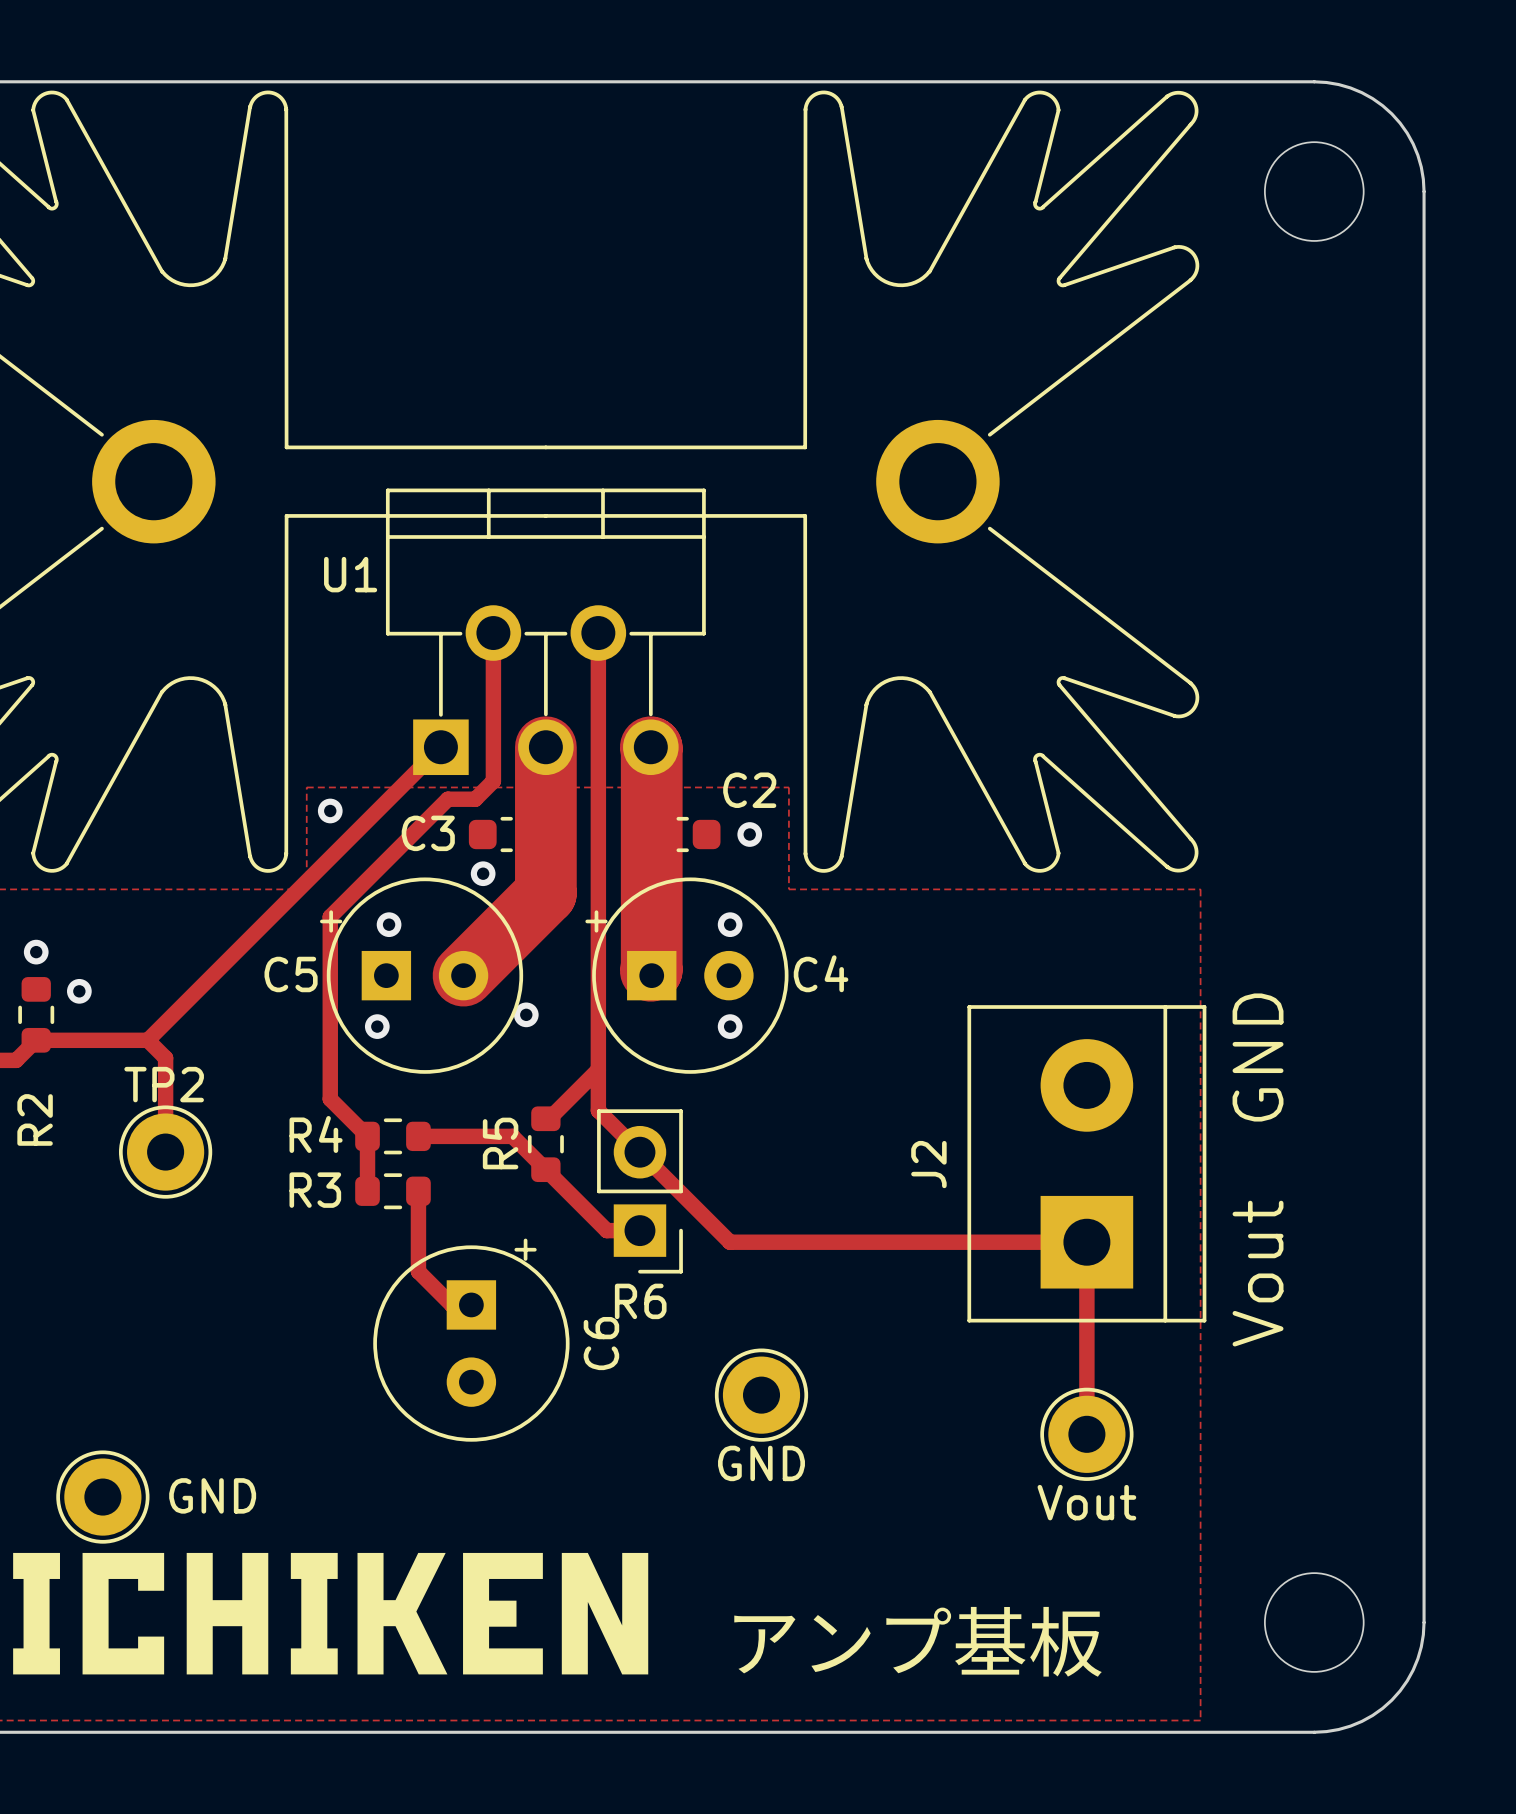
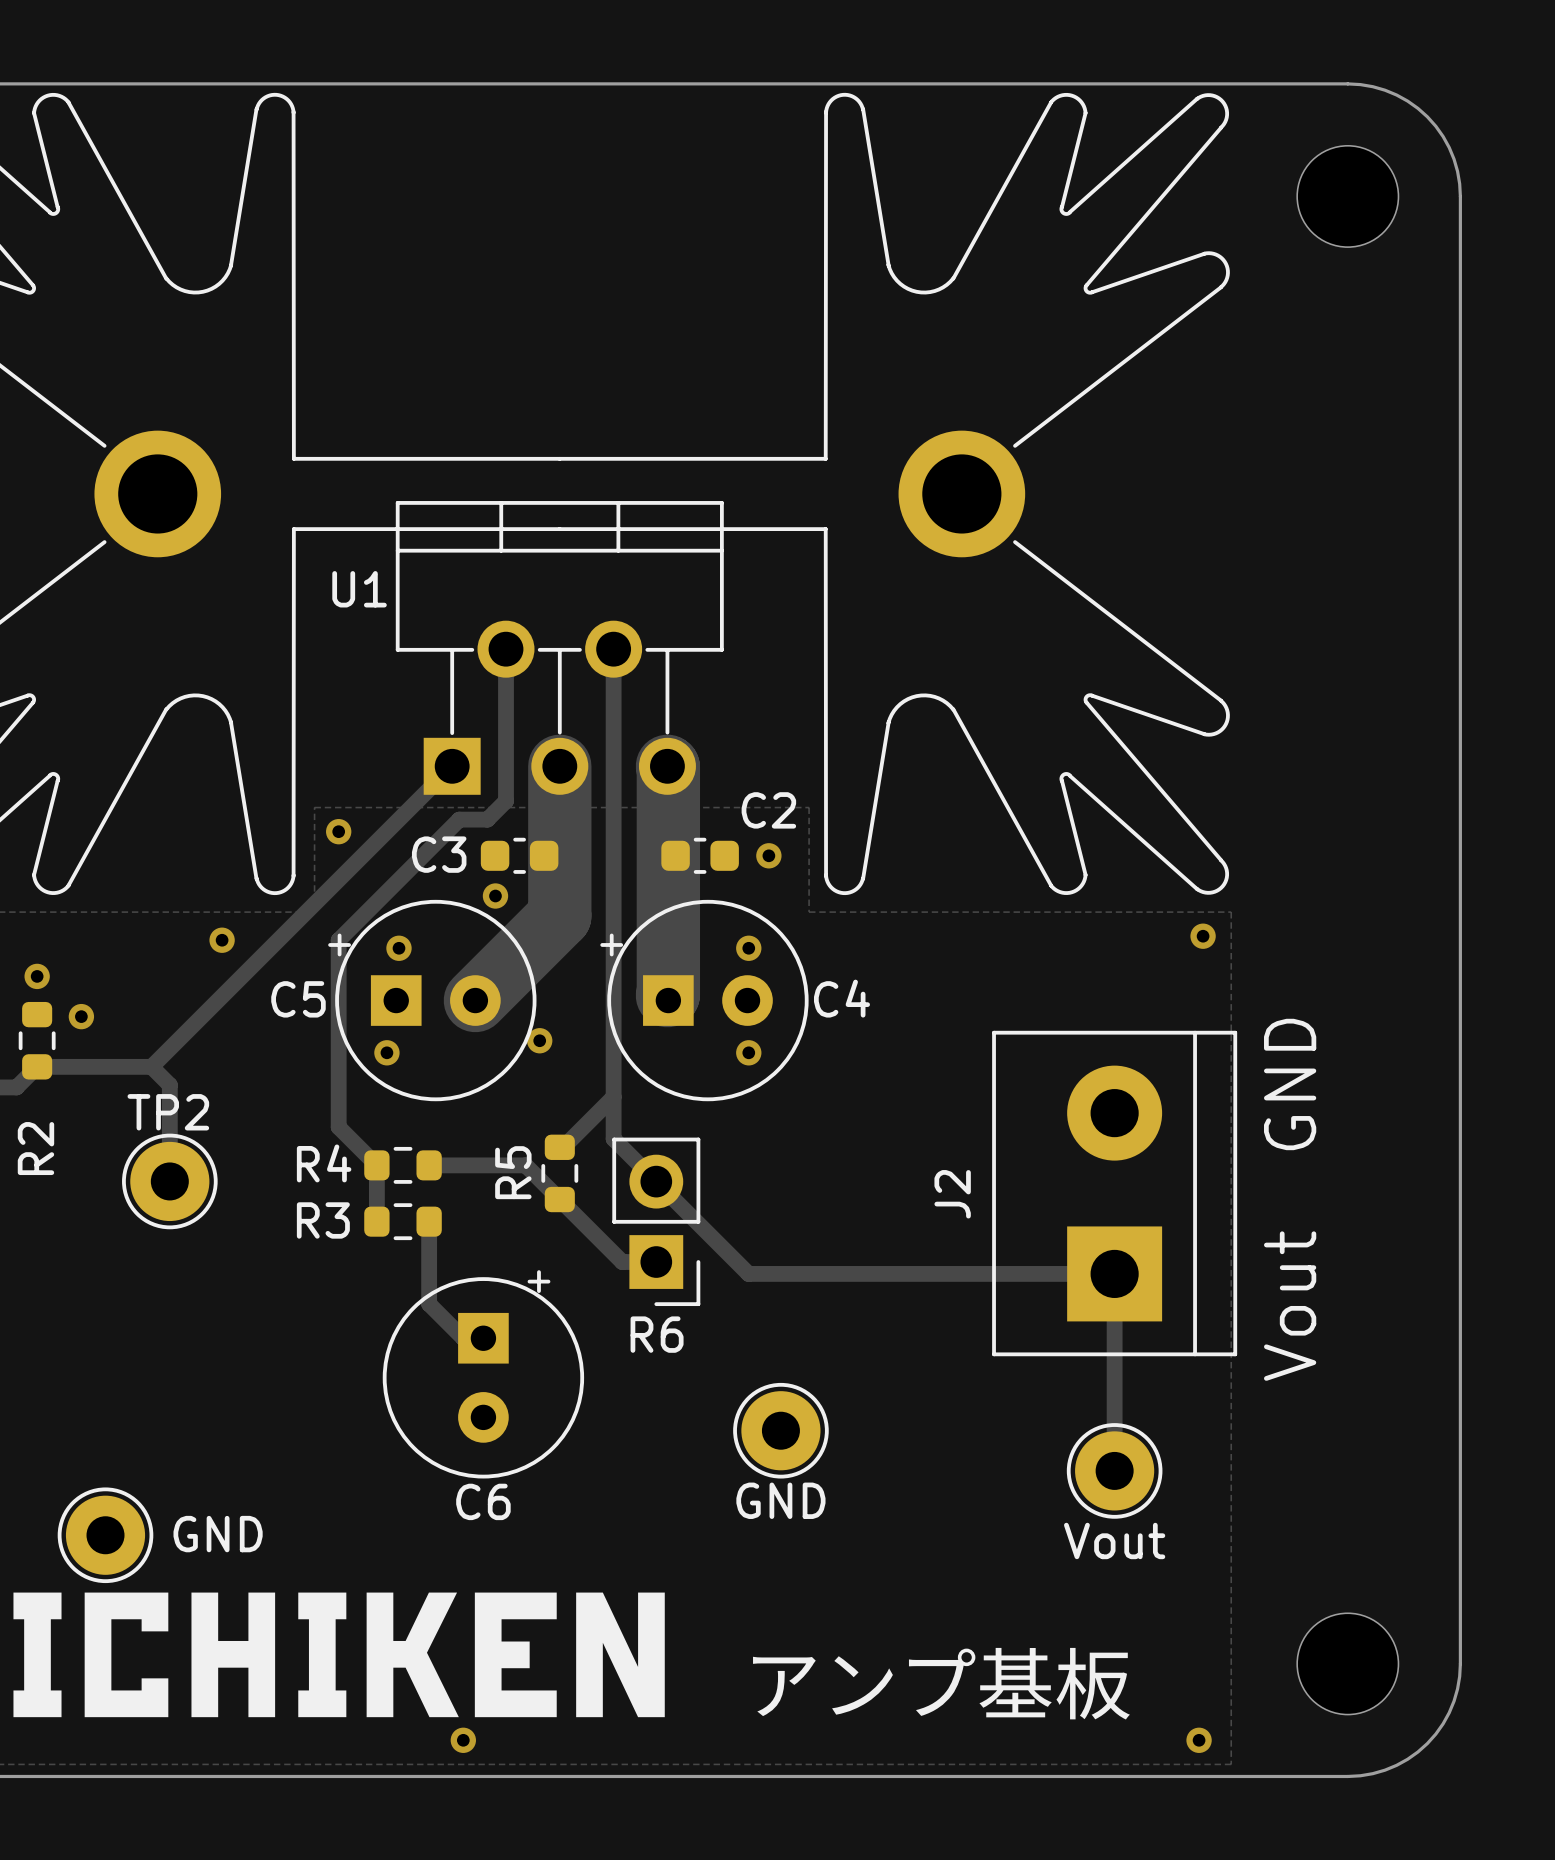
via: none -> (1203, 936)
via: none -> (222, 940)
C6 name rotation: 0° (601, 1343) -> 90° clockwise (483, 1501)
C6 name position: C6 (601, 1343) -> C6 (483, 1501)
via: none -> (463, 1740)
via: none -> (1199, 1740)

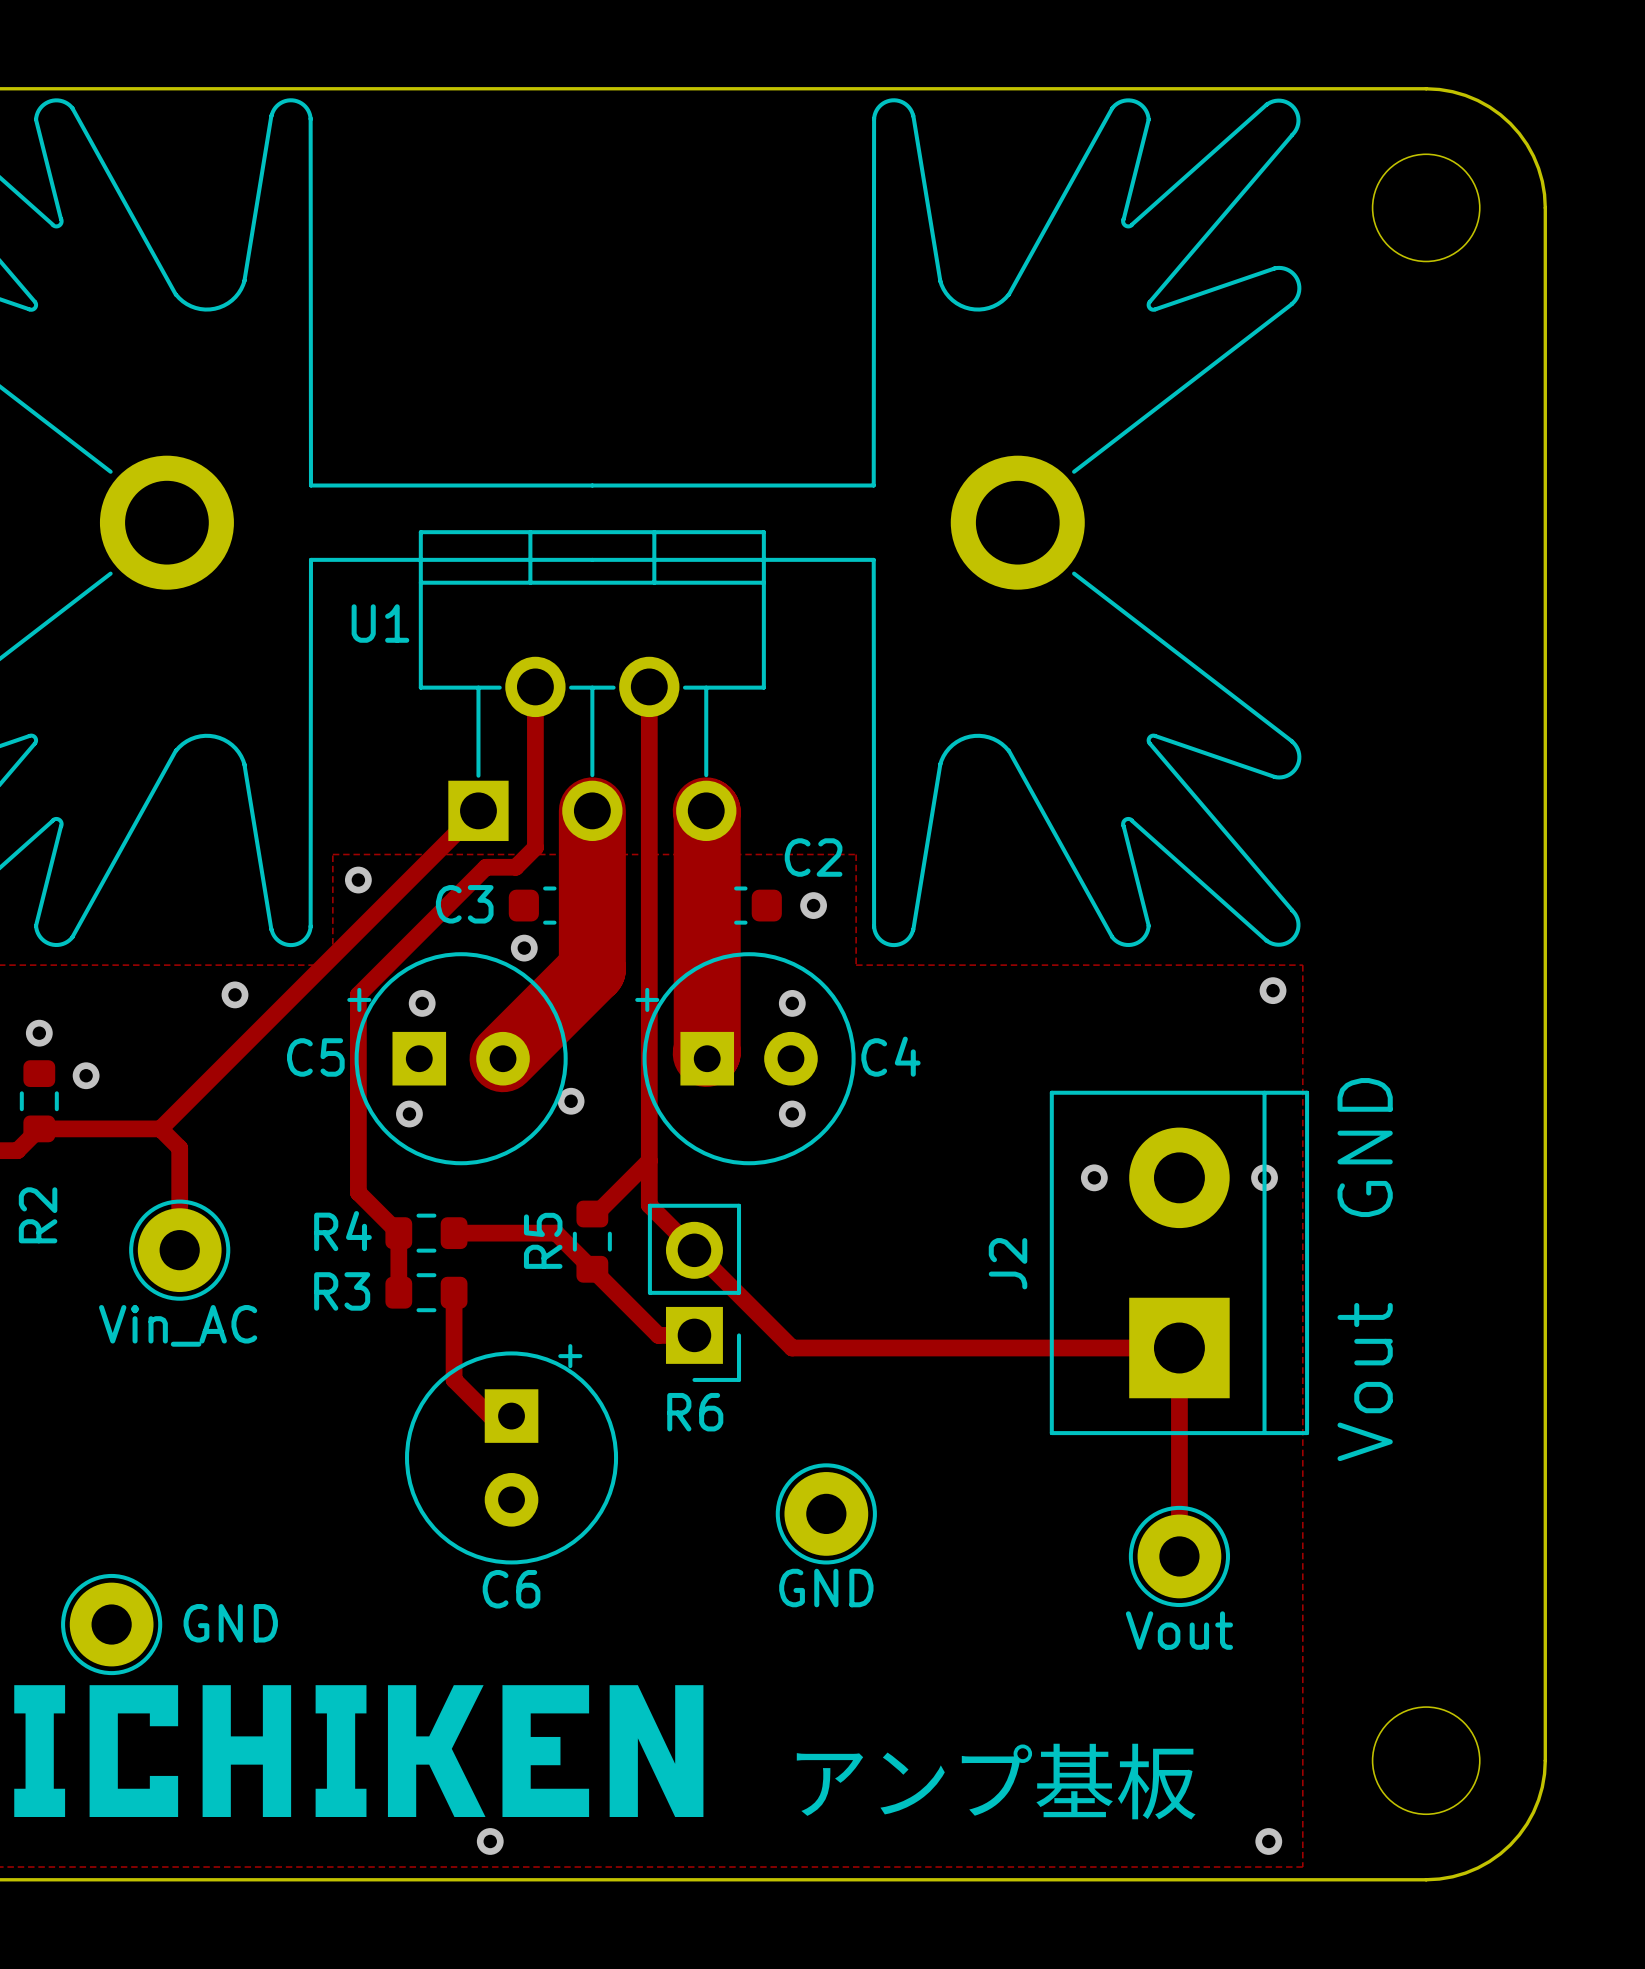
TP2 name: TP2 (168, 1112) -> none
via: none -> (1094, 1177)
via: none -> (1264, 1177)
TP2 value: none -> Vin_AC (178, 1325)

